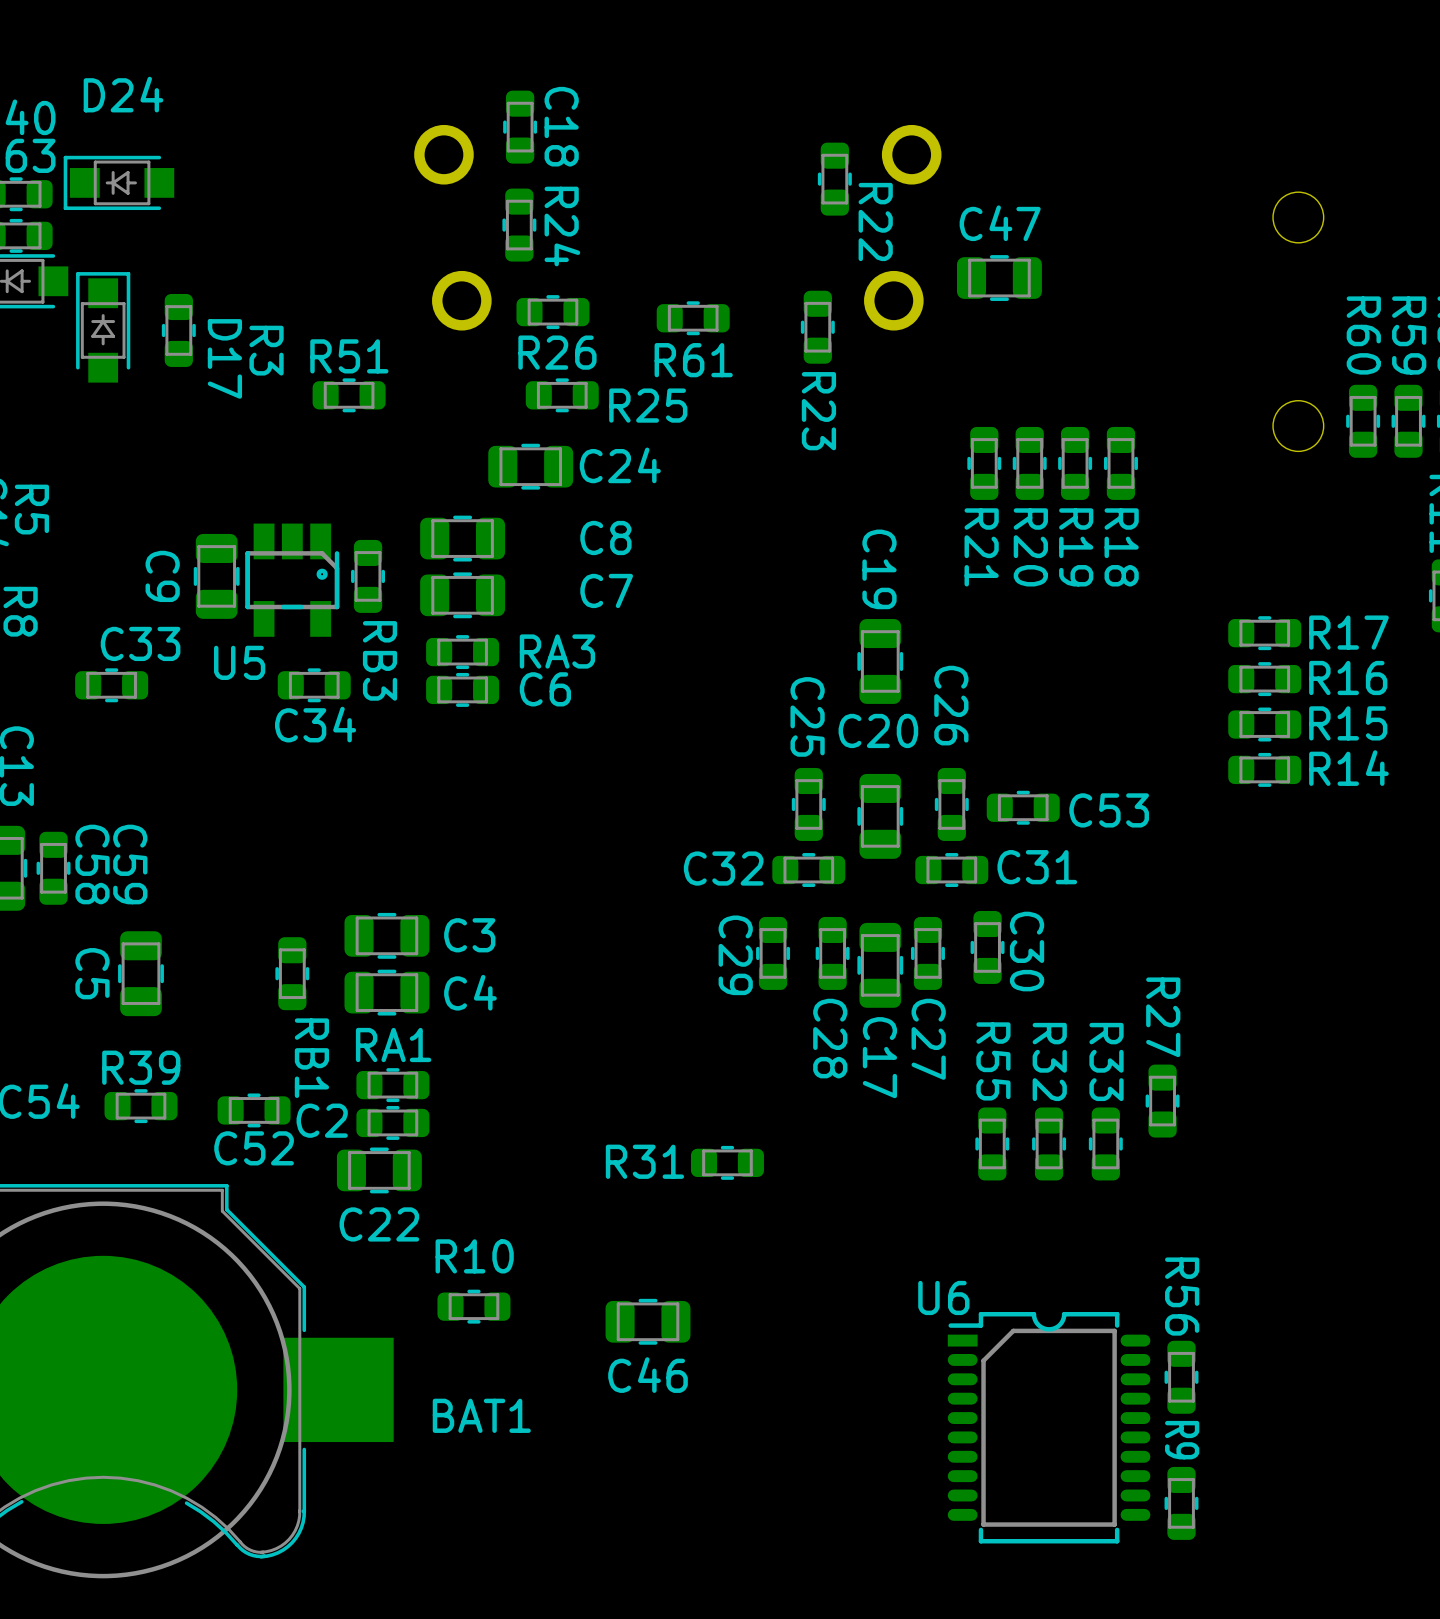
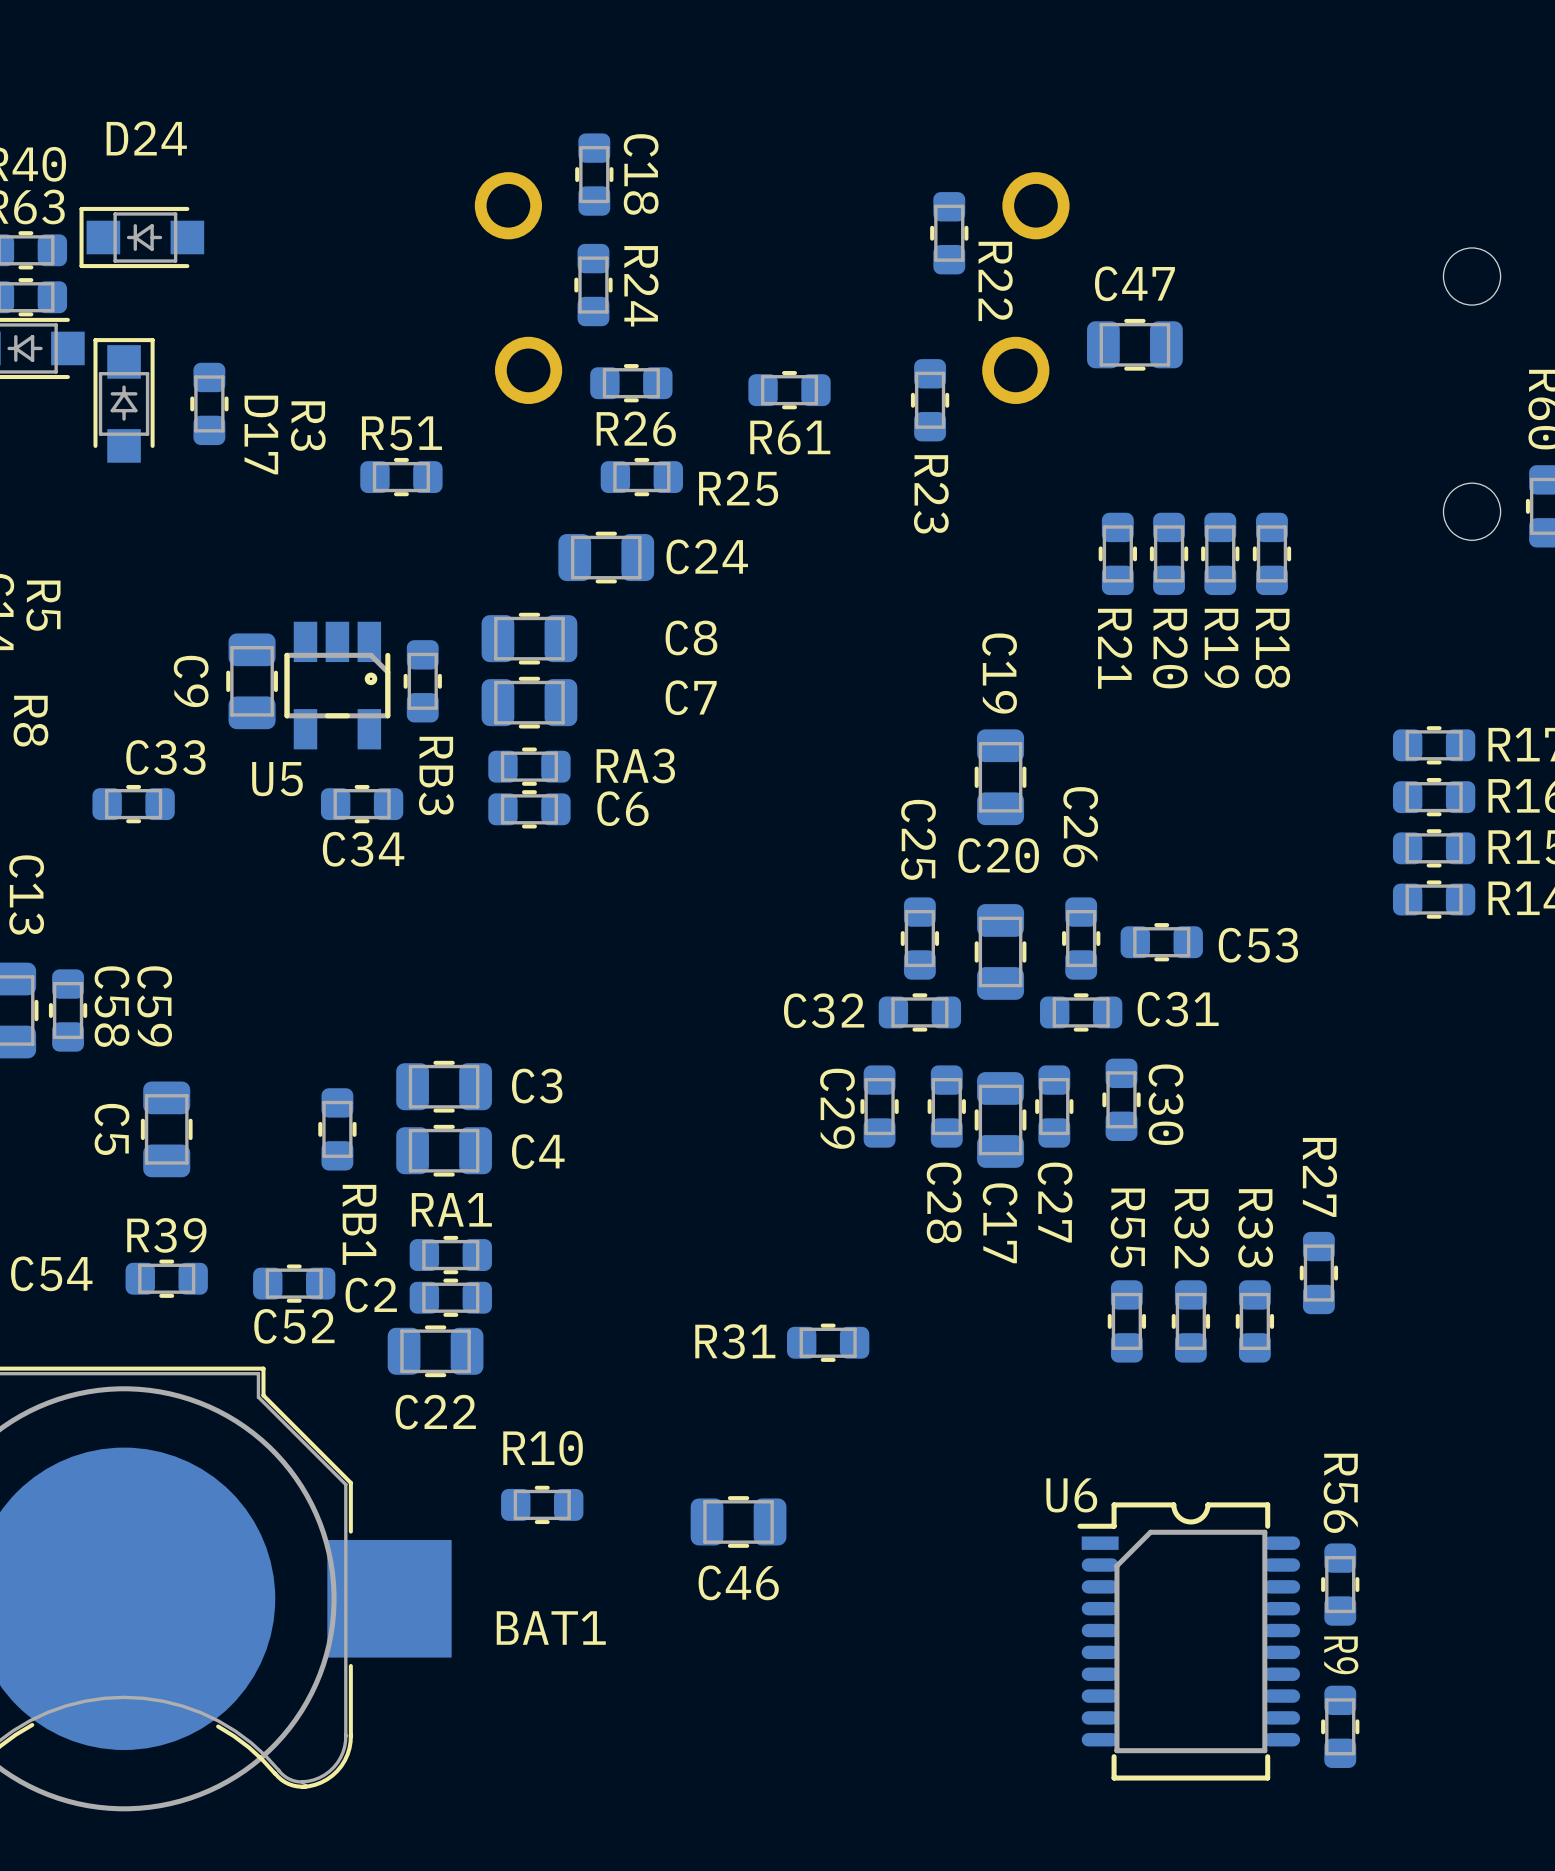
U6 footprint: [947, 1311, 1151, 1544] -> [1077, 1502, 1301, 1781]

